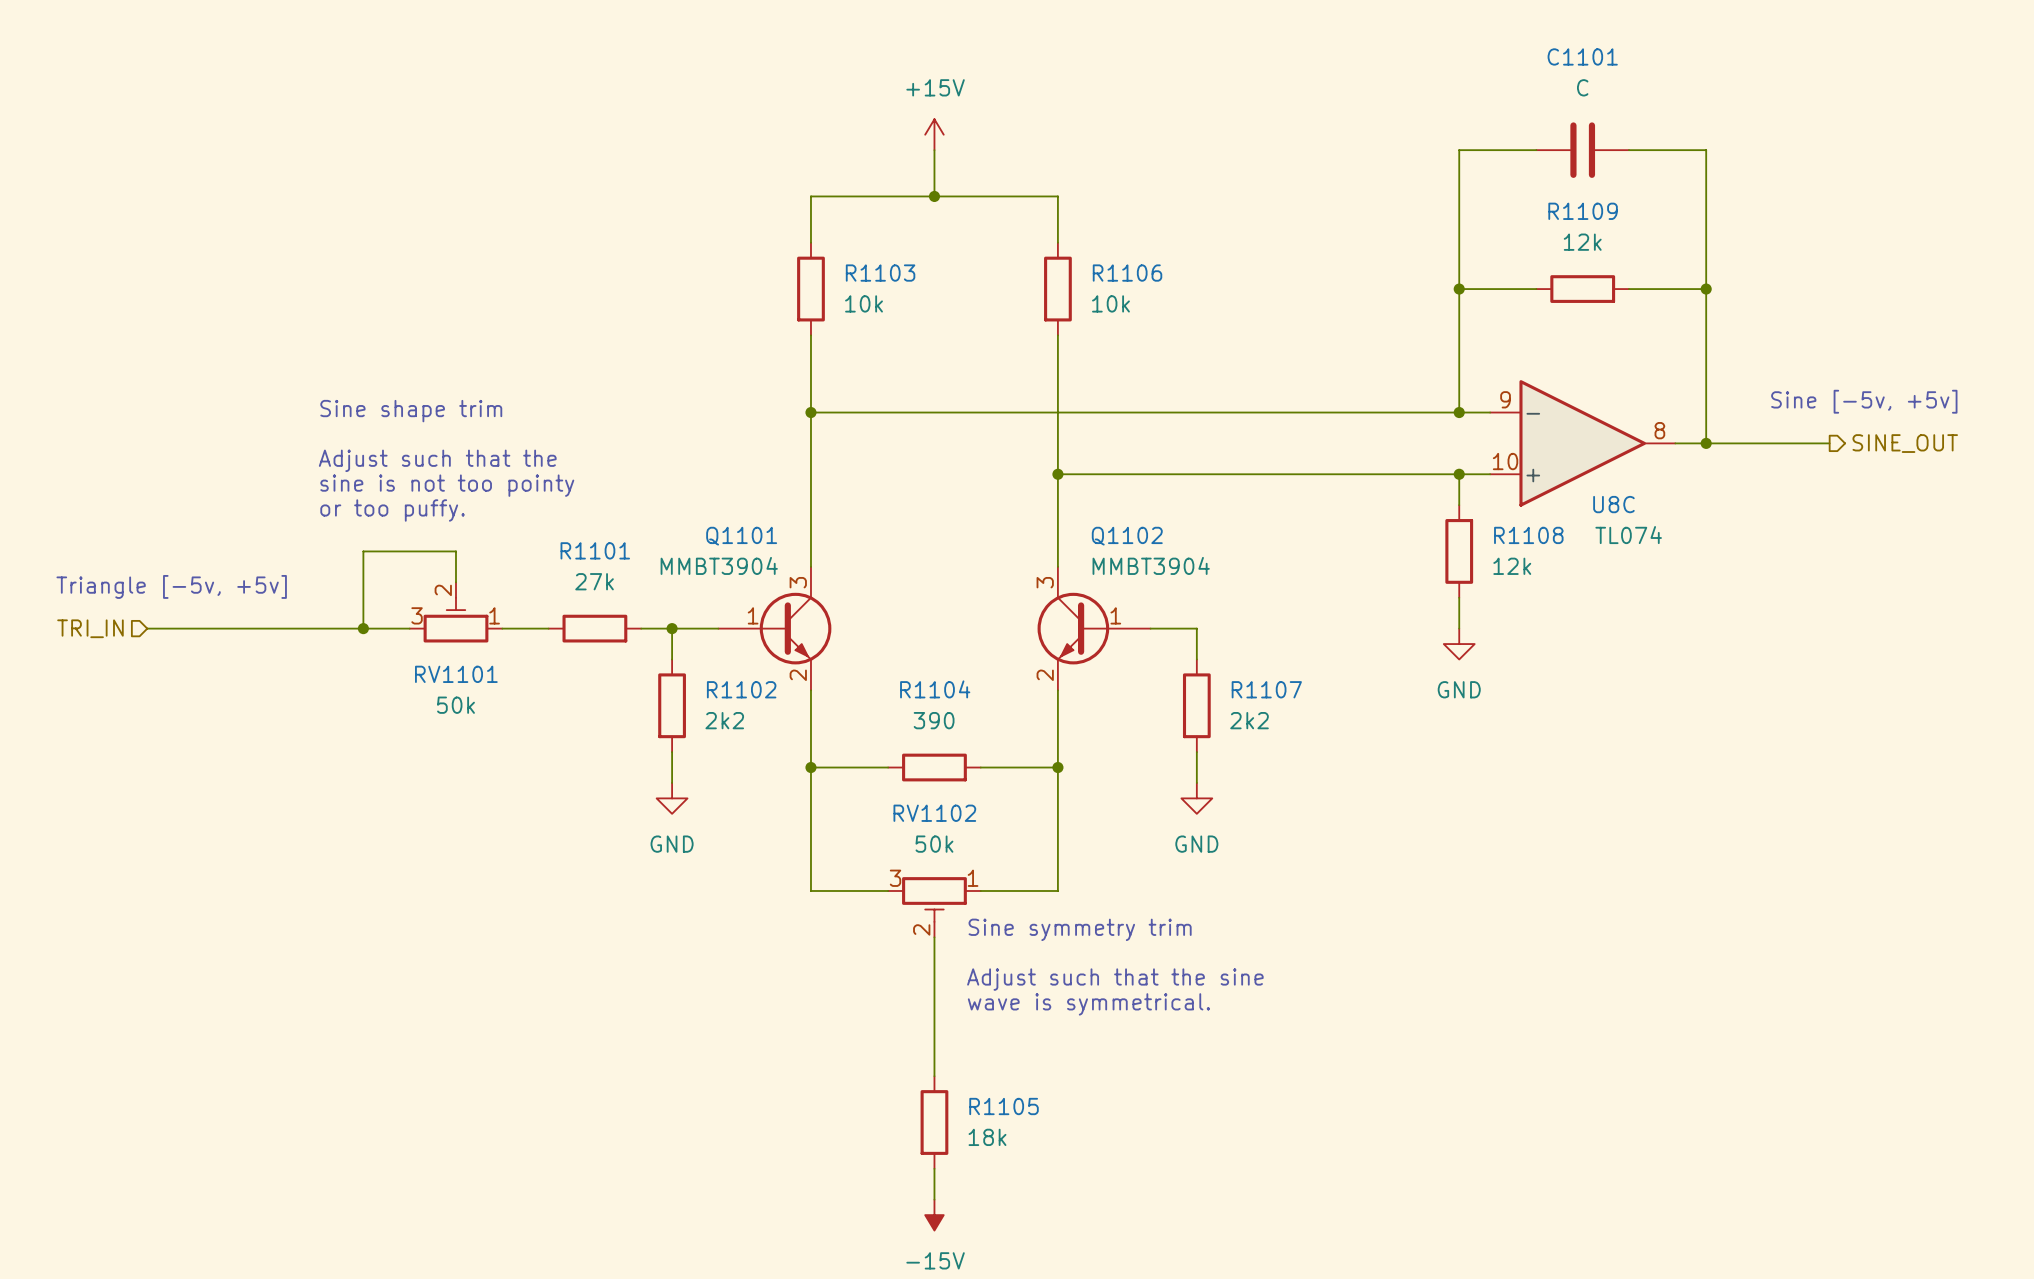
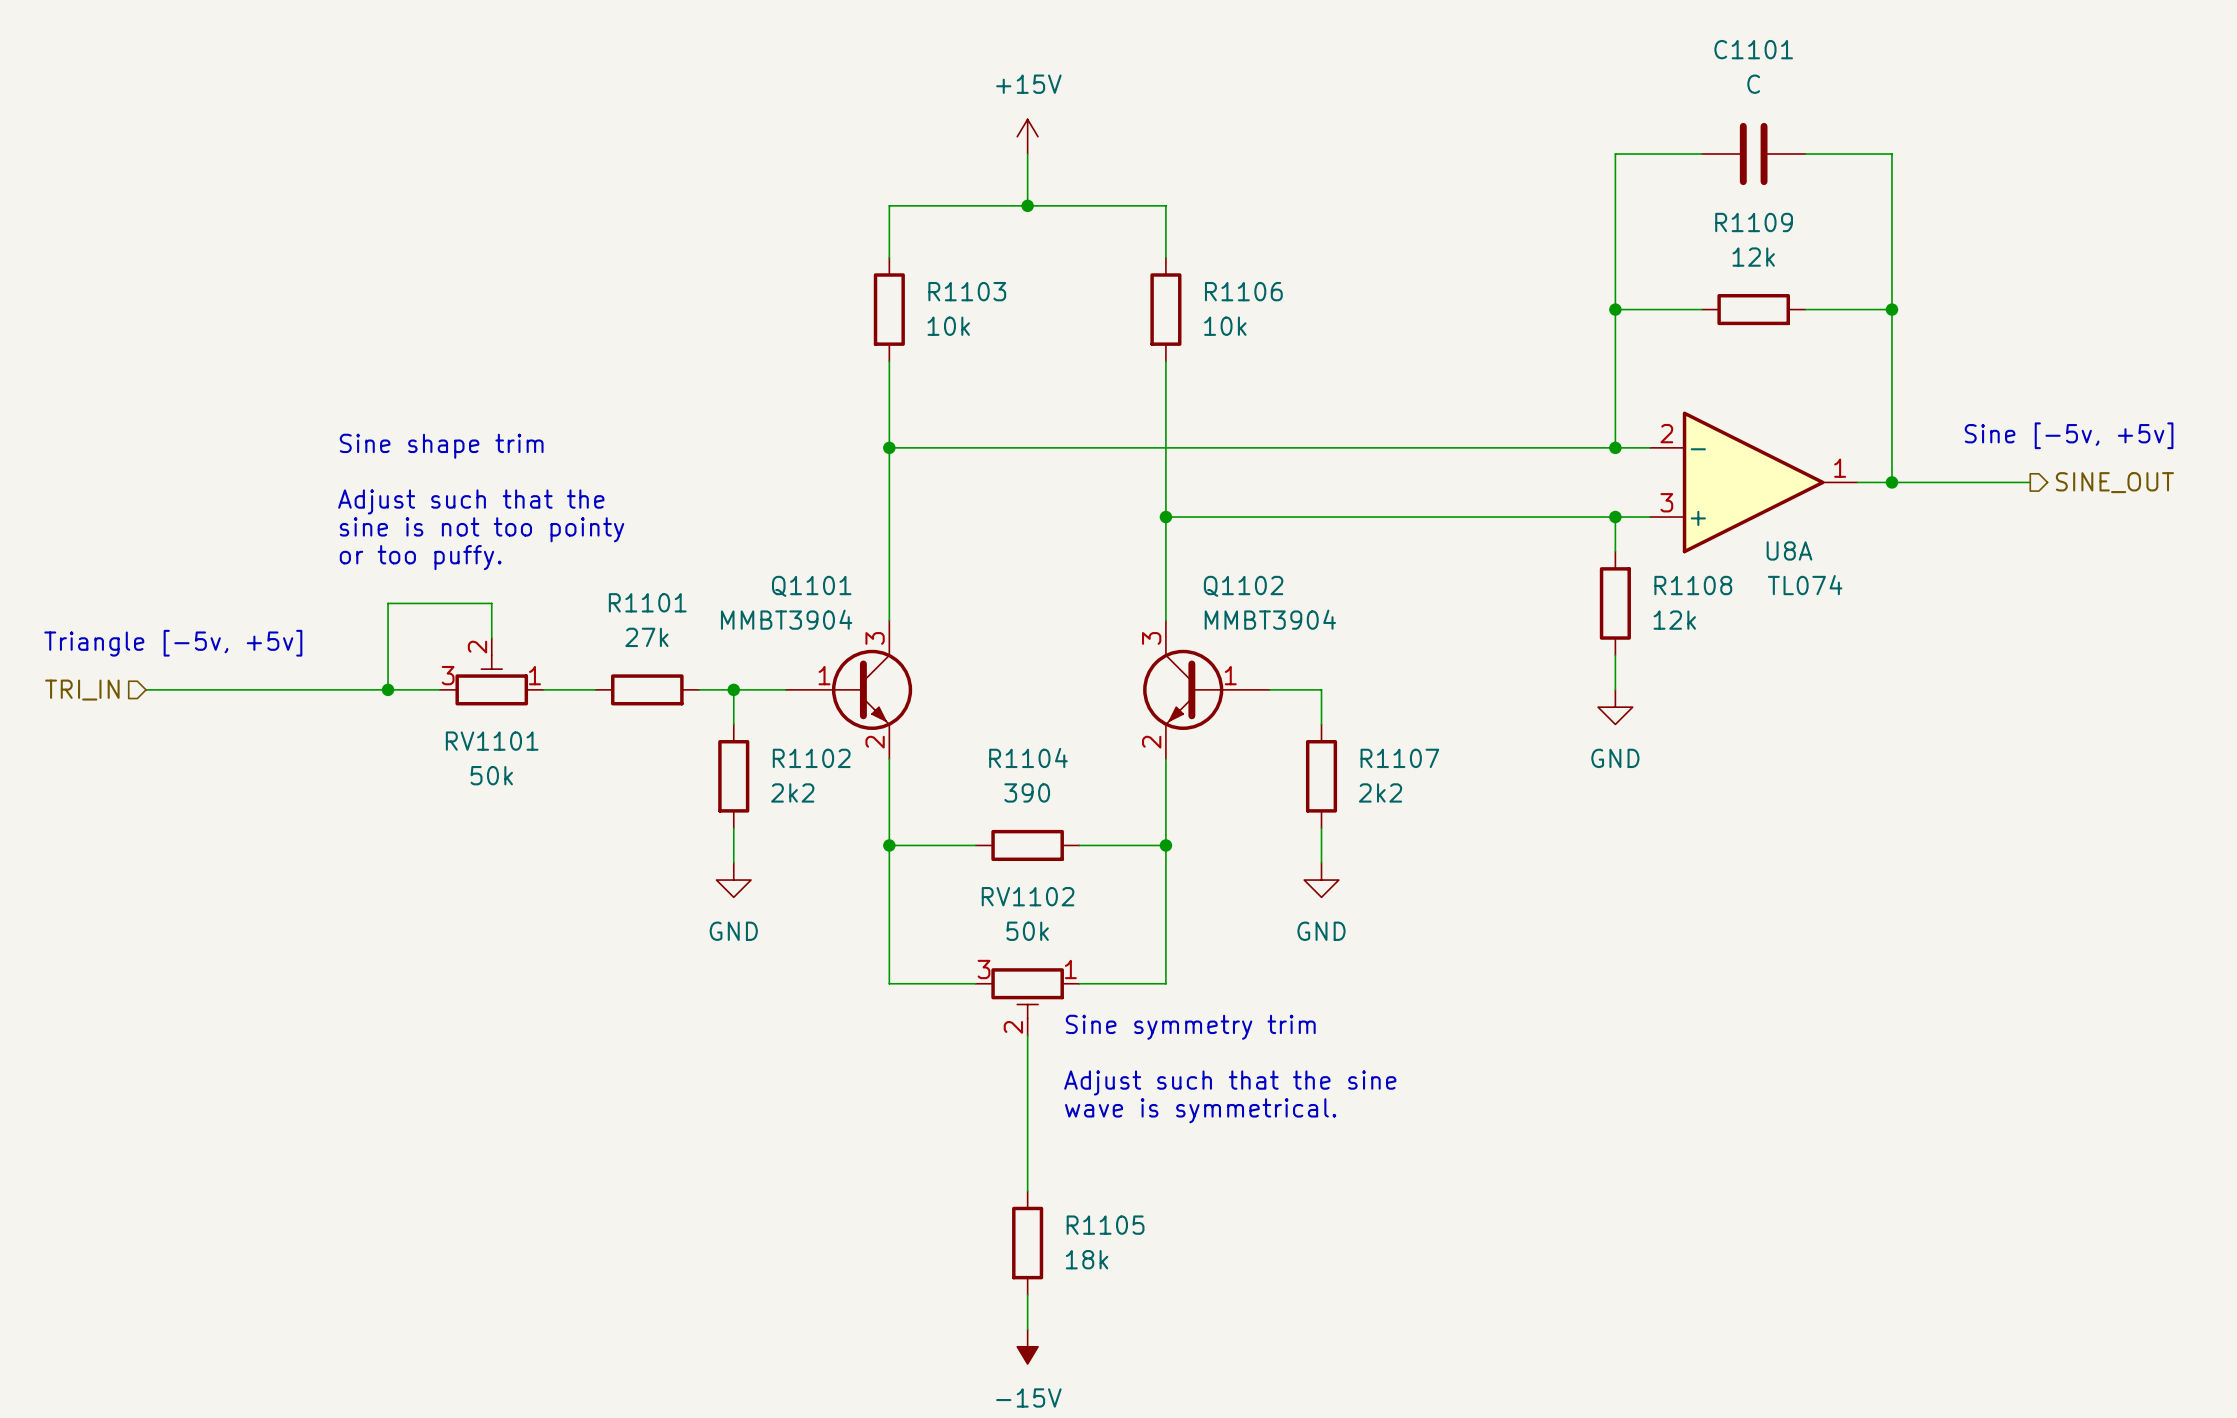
U8C pin number: 9 (1505, 399) -> 2 (1666, 433)
U8C pin number: 8 (1659, 430) -> 1 (1840, 468)
U8C pin number: 10 (1505, 461) -> 3 (1666, 502)
U8C name: U8C (1613, 504) -> U8A (1789, 550)

